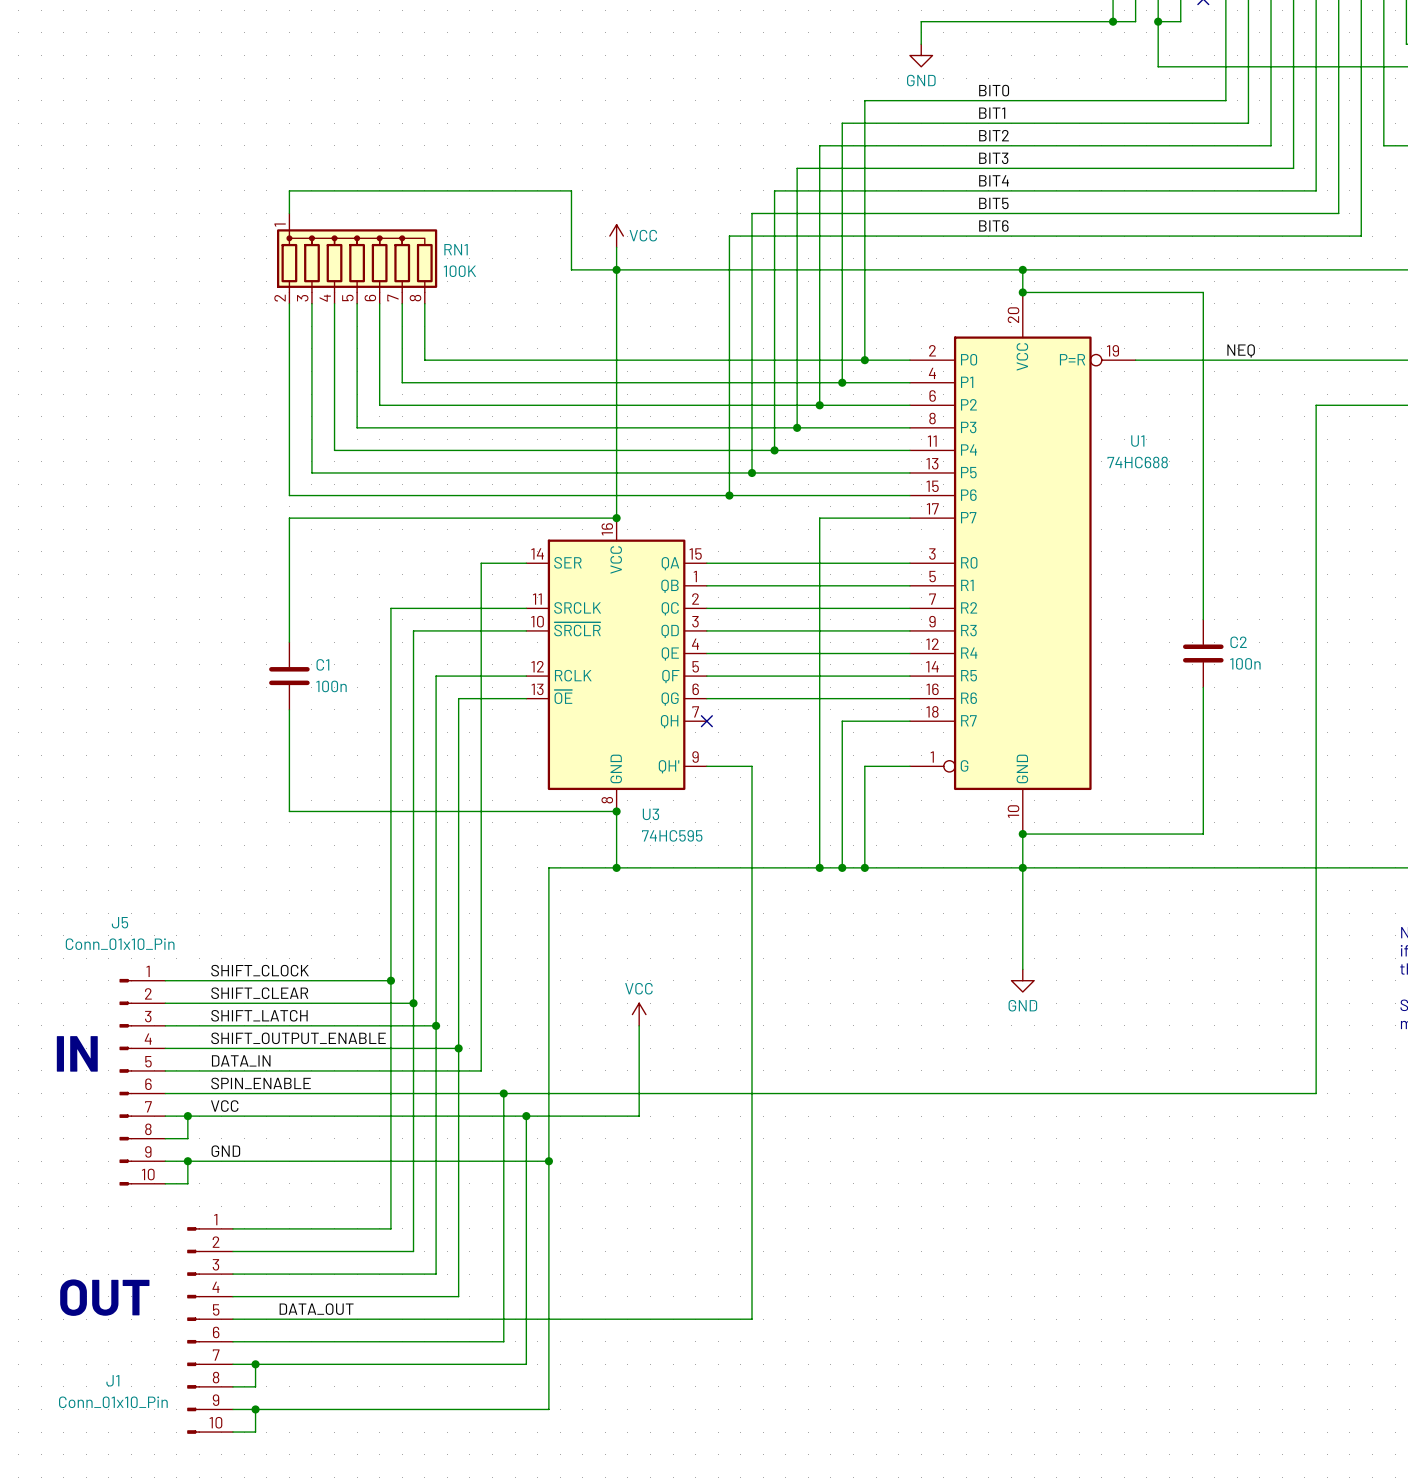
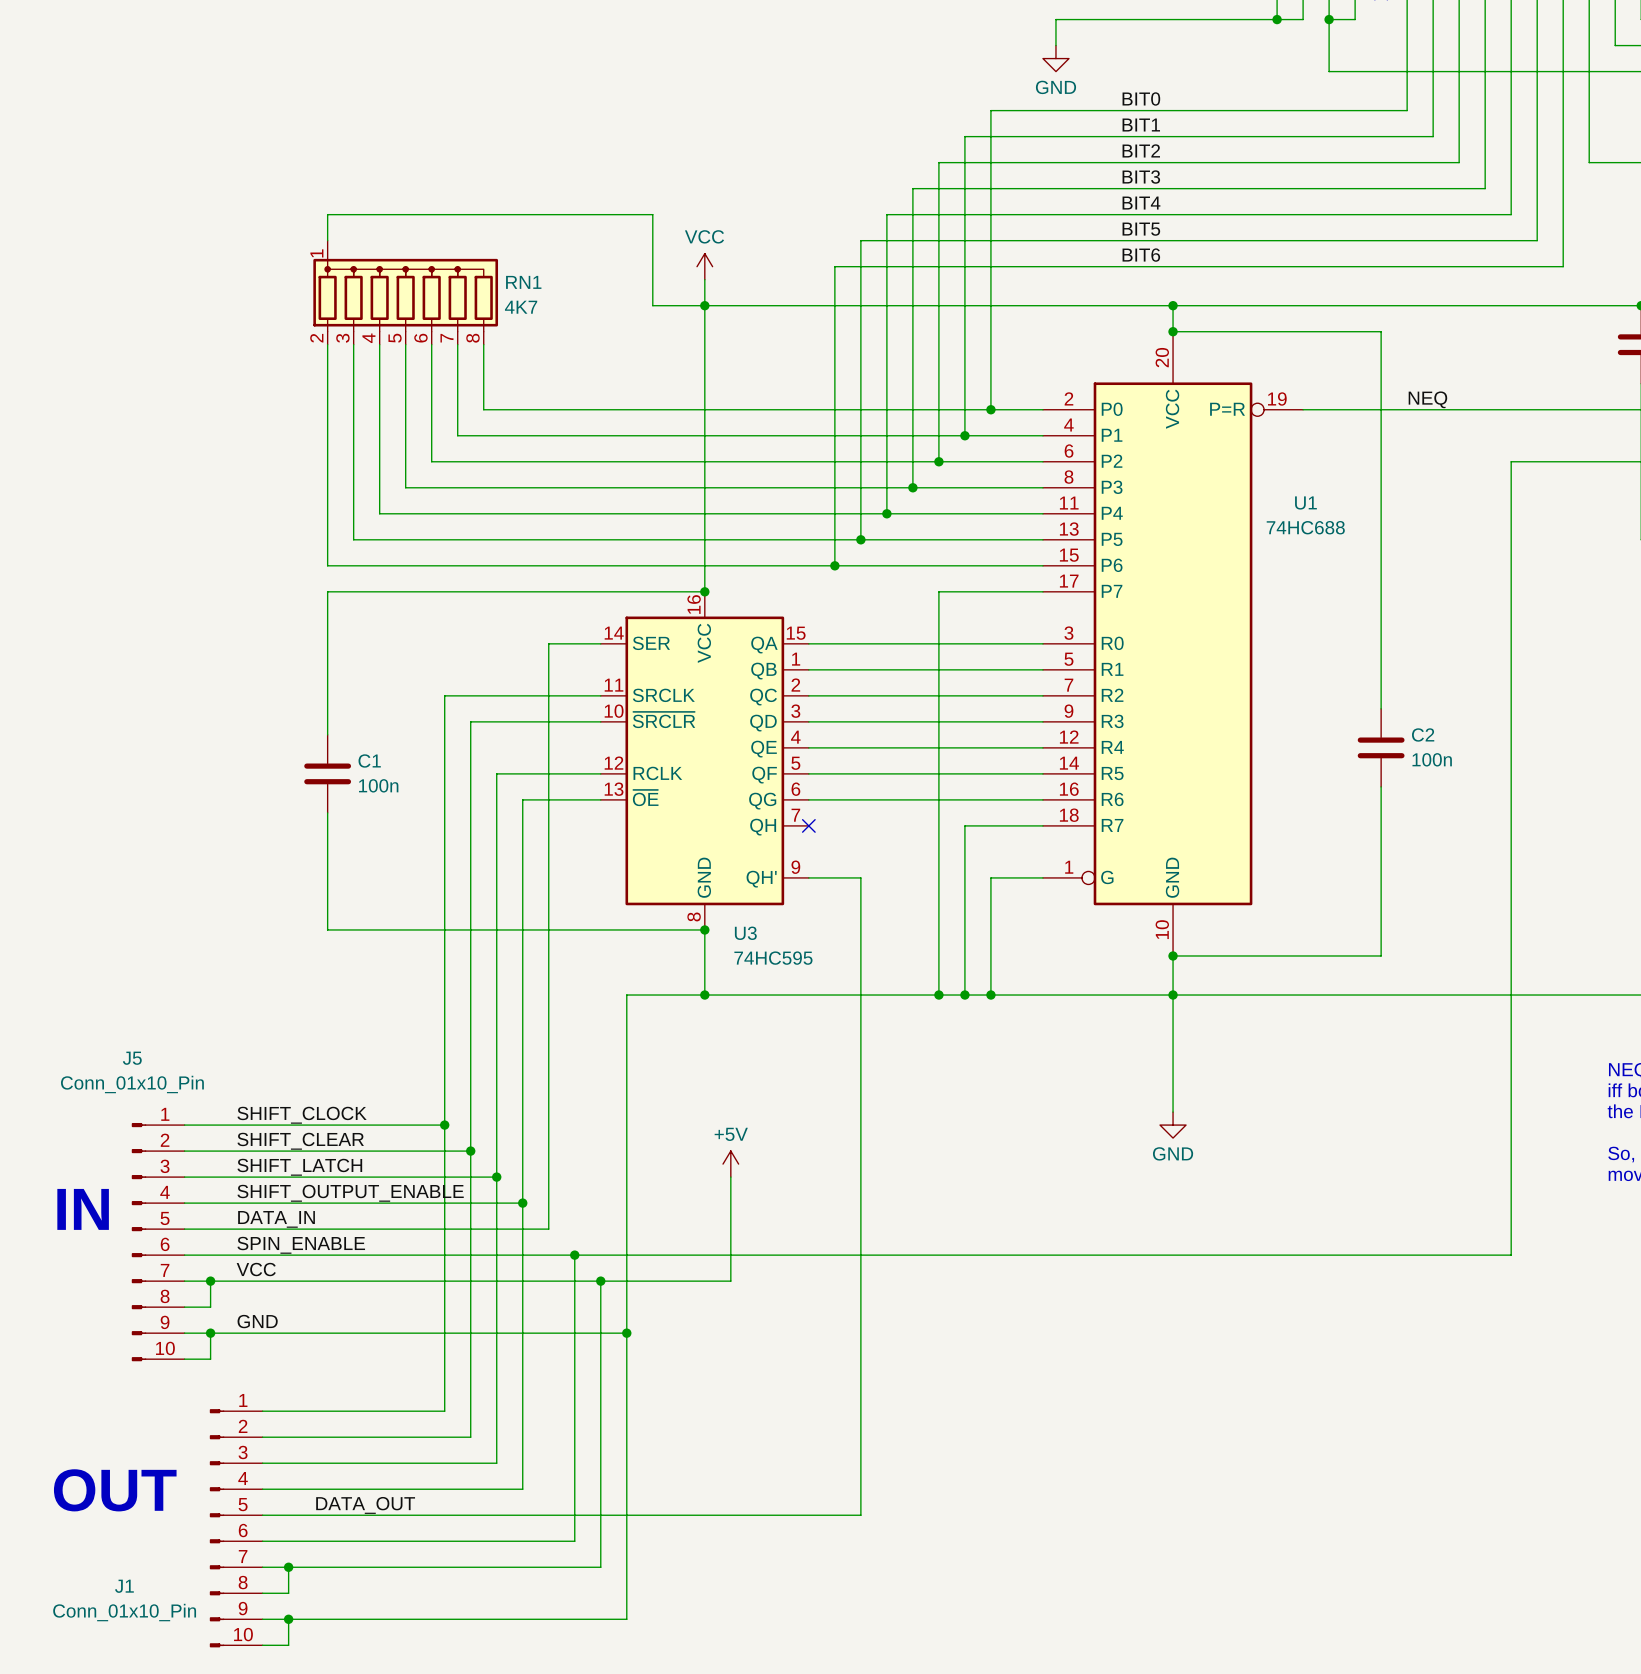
power symbol text position: VCC (643, 235) -> VCC (704, 236)
RN1 value: 100K (459, 271) -> 4K7 (521, 307)
power symbol: VCC (639, 1014) -> +5V (730, 1164)

